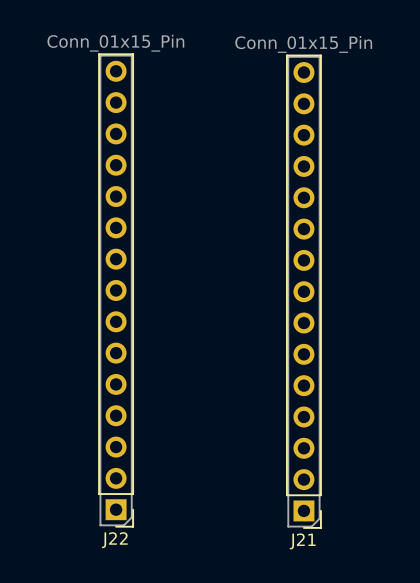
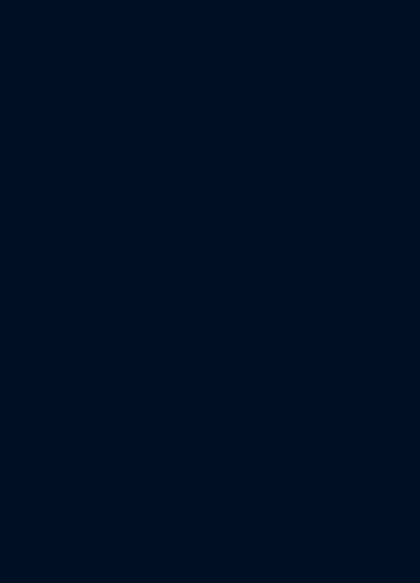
J22: Conn_01x15_Pin (116, 290) -> none
J21: Conn_01x15_Pin (303, 291) -> none

